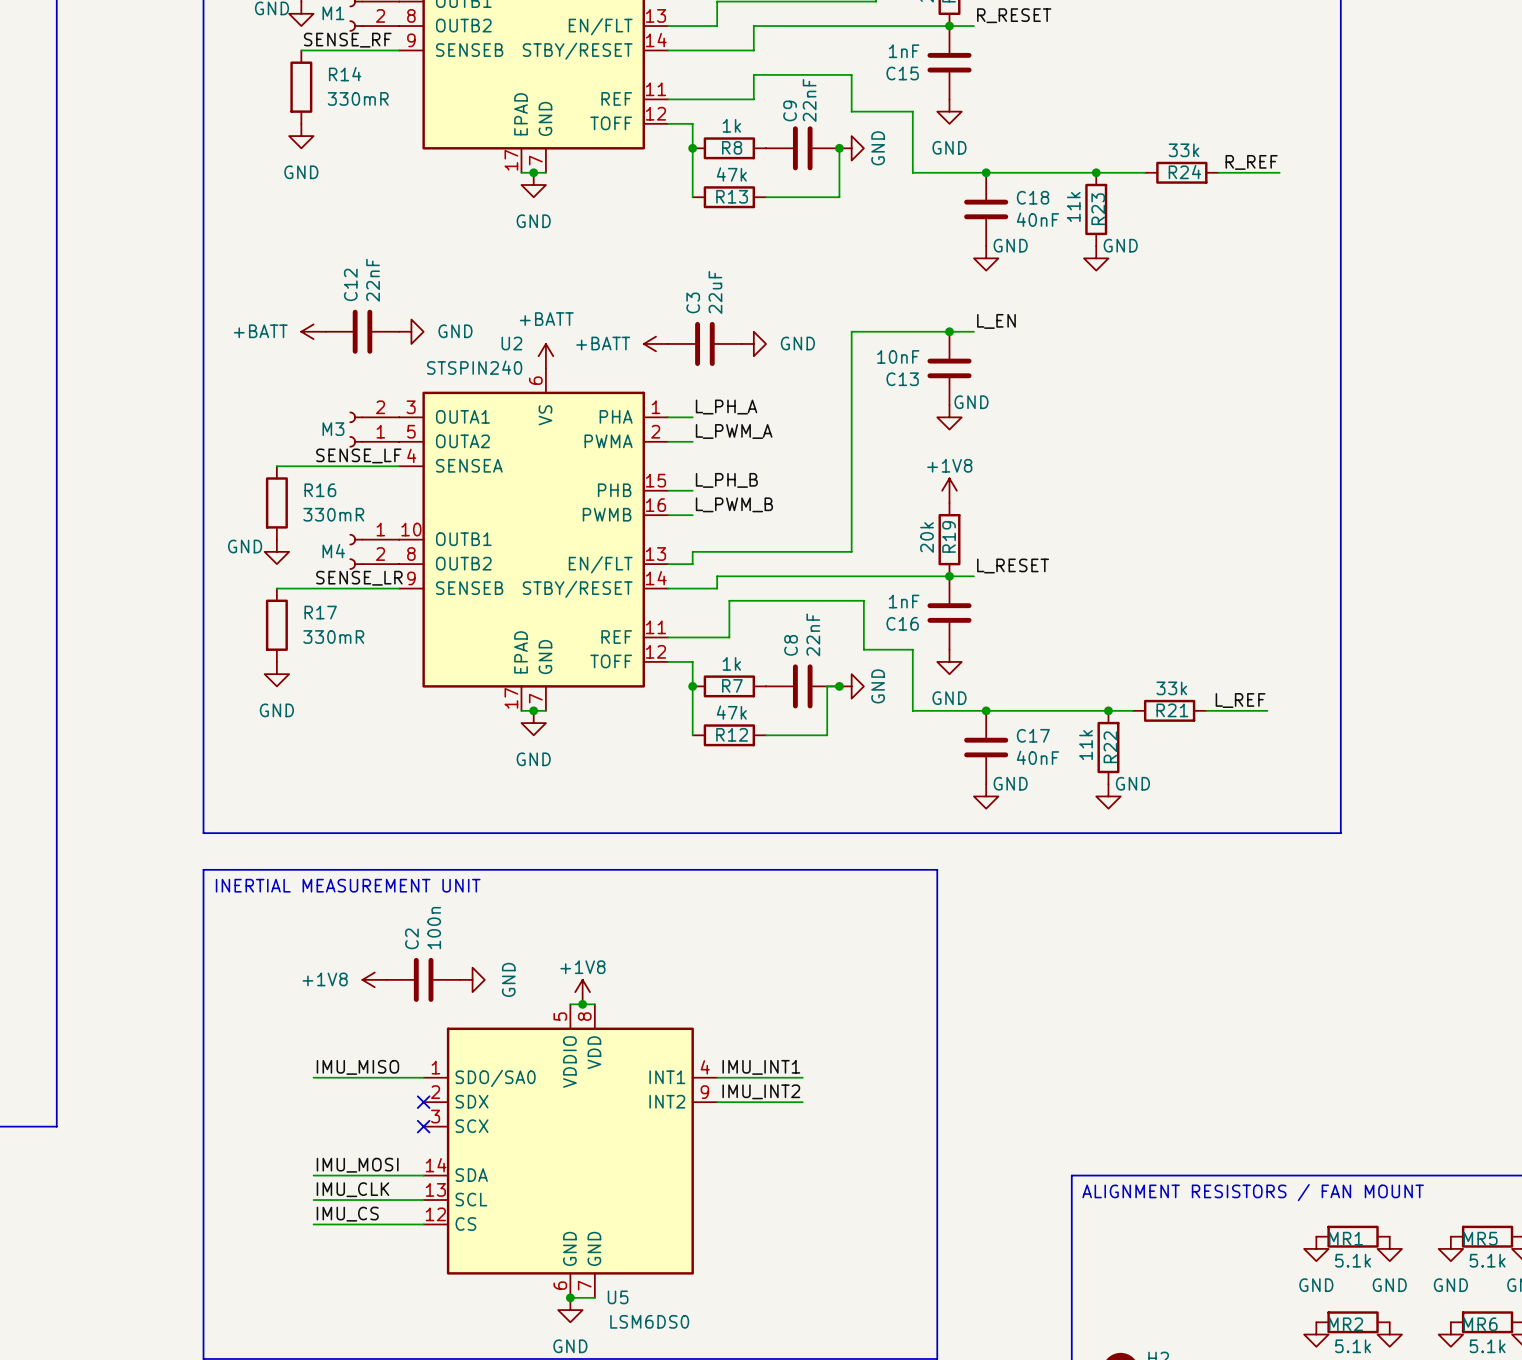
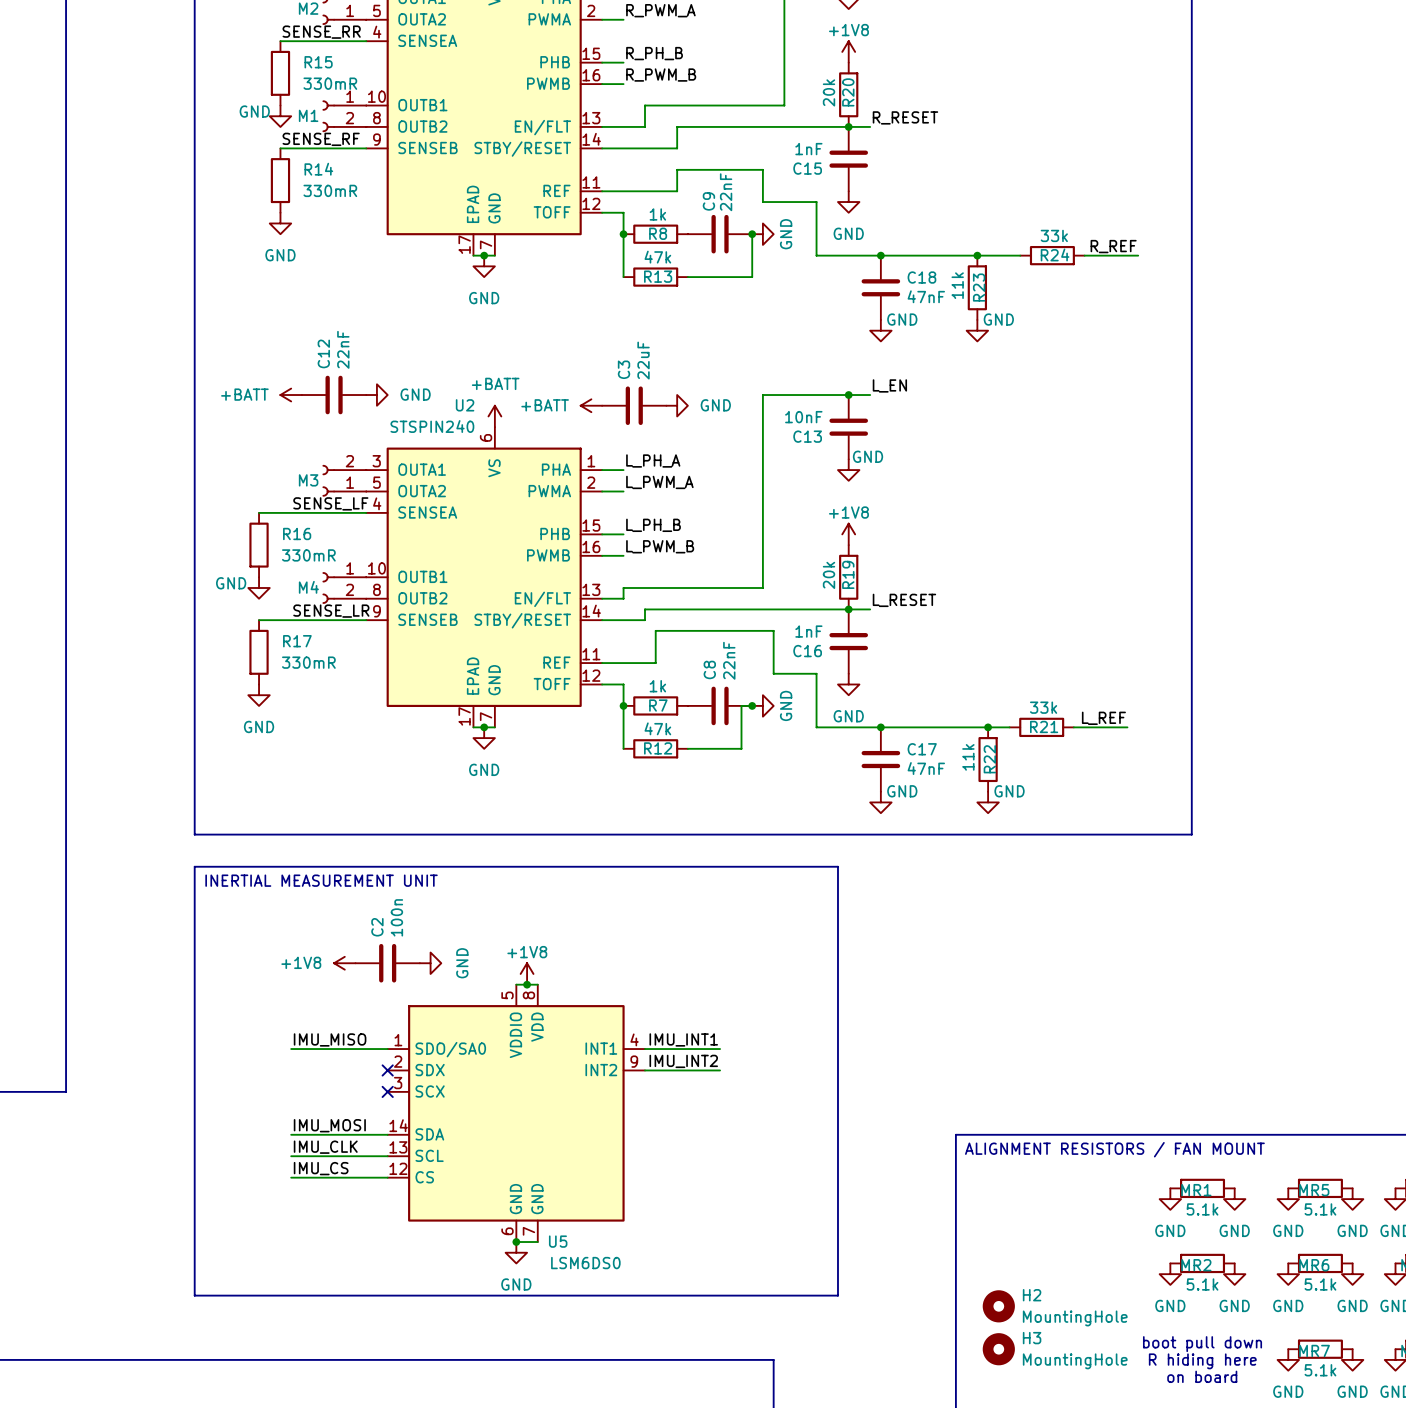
C18 value: 40nF (1037, 219) -> 47nF (926, 296)
C17 value: 40nF (1037, 757) -> 47nF (926, 768)

